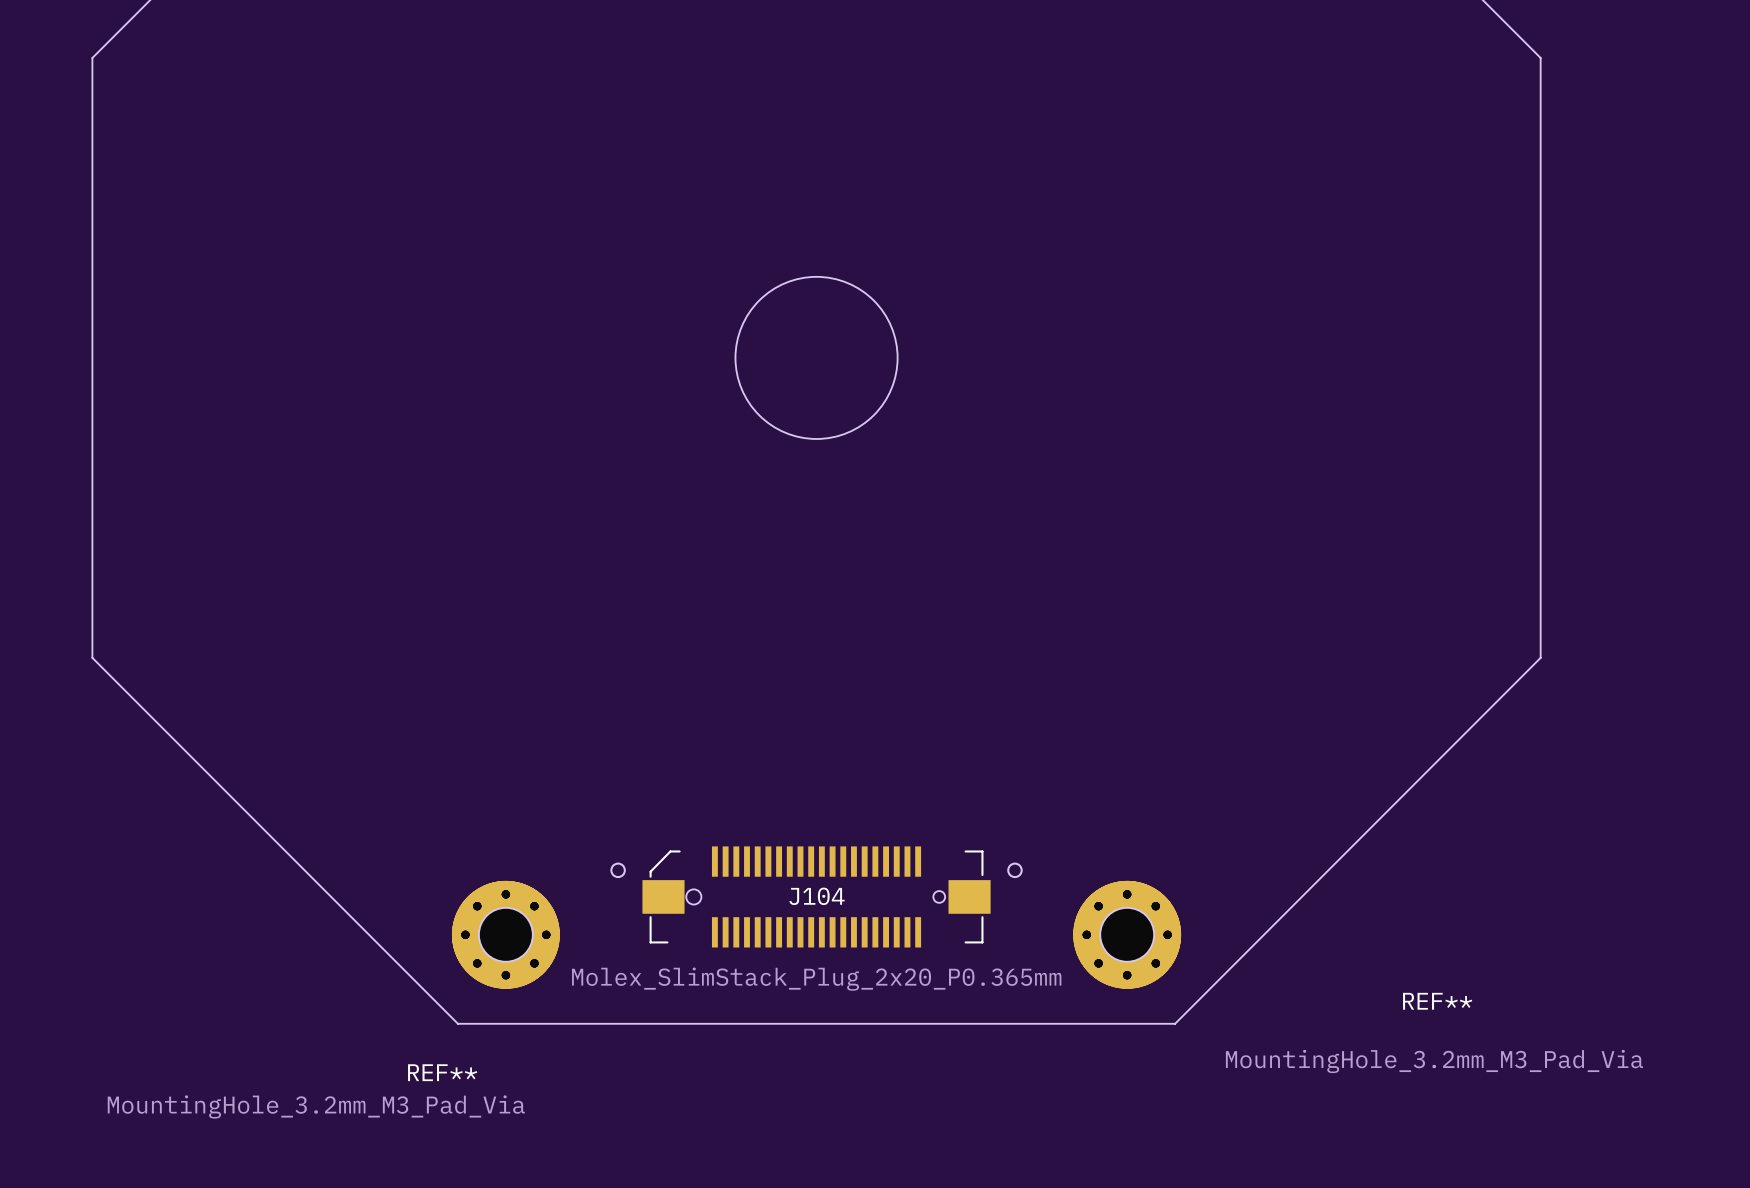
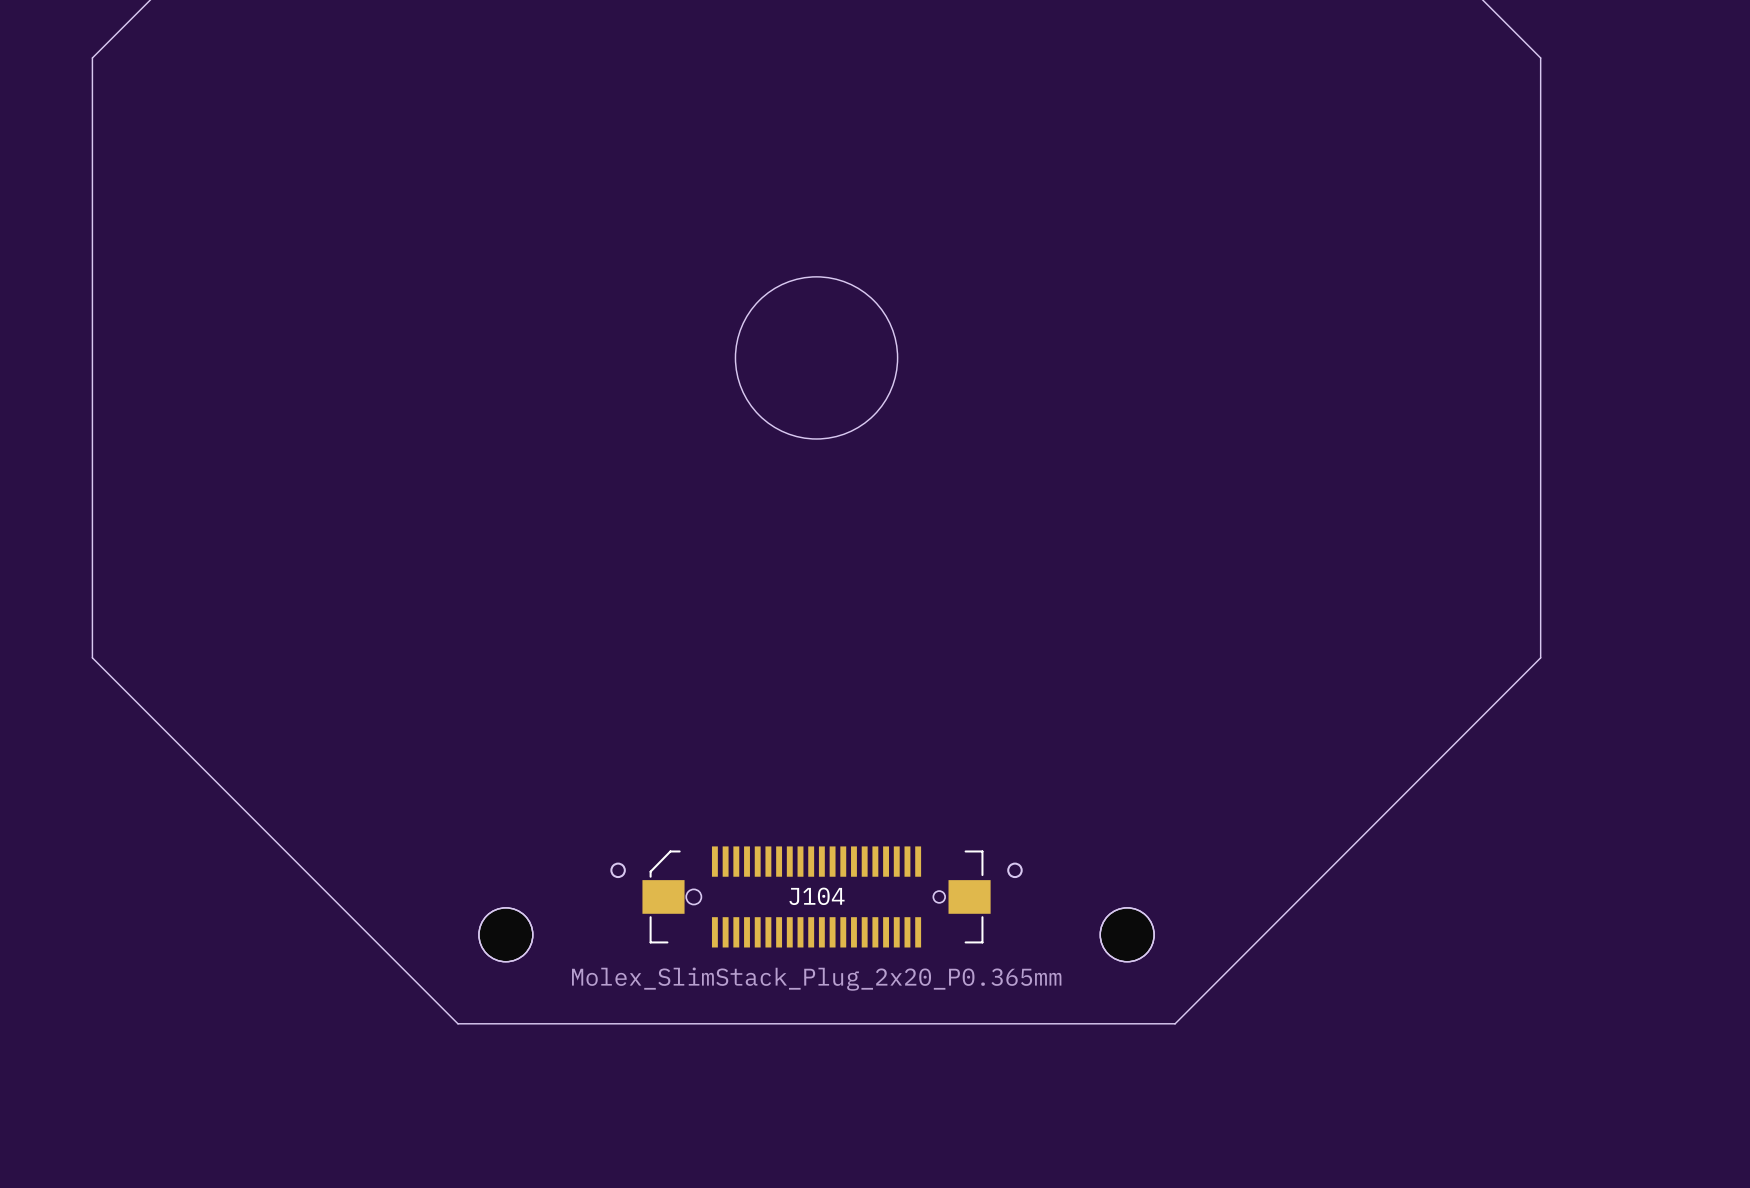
part footprint: [451, 880, 560, 989] -> [478, 907, 533, 962]
part footprint: [1073, 880, 1182, 989] -> [1100, 907, 1155, 962]
REF**: MountingHole_3.2mm_M3_Pad_Via (505, 934) -> none
REF**: MountingHole_3.2mm_M3_Pad_Via (1127, 934) -> none

